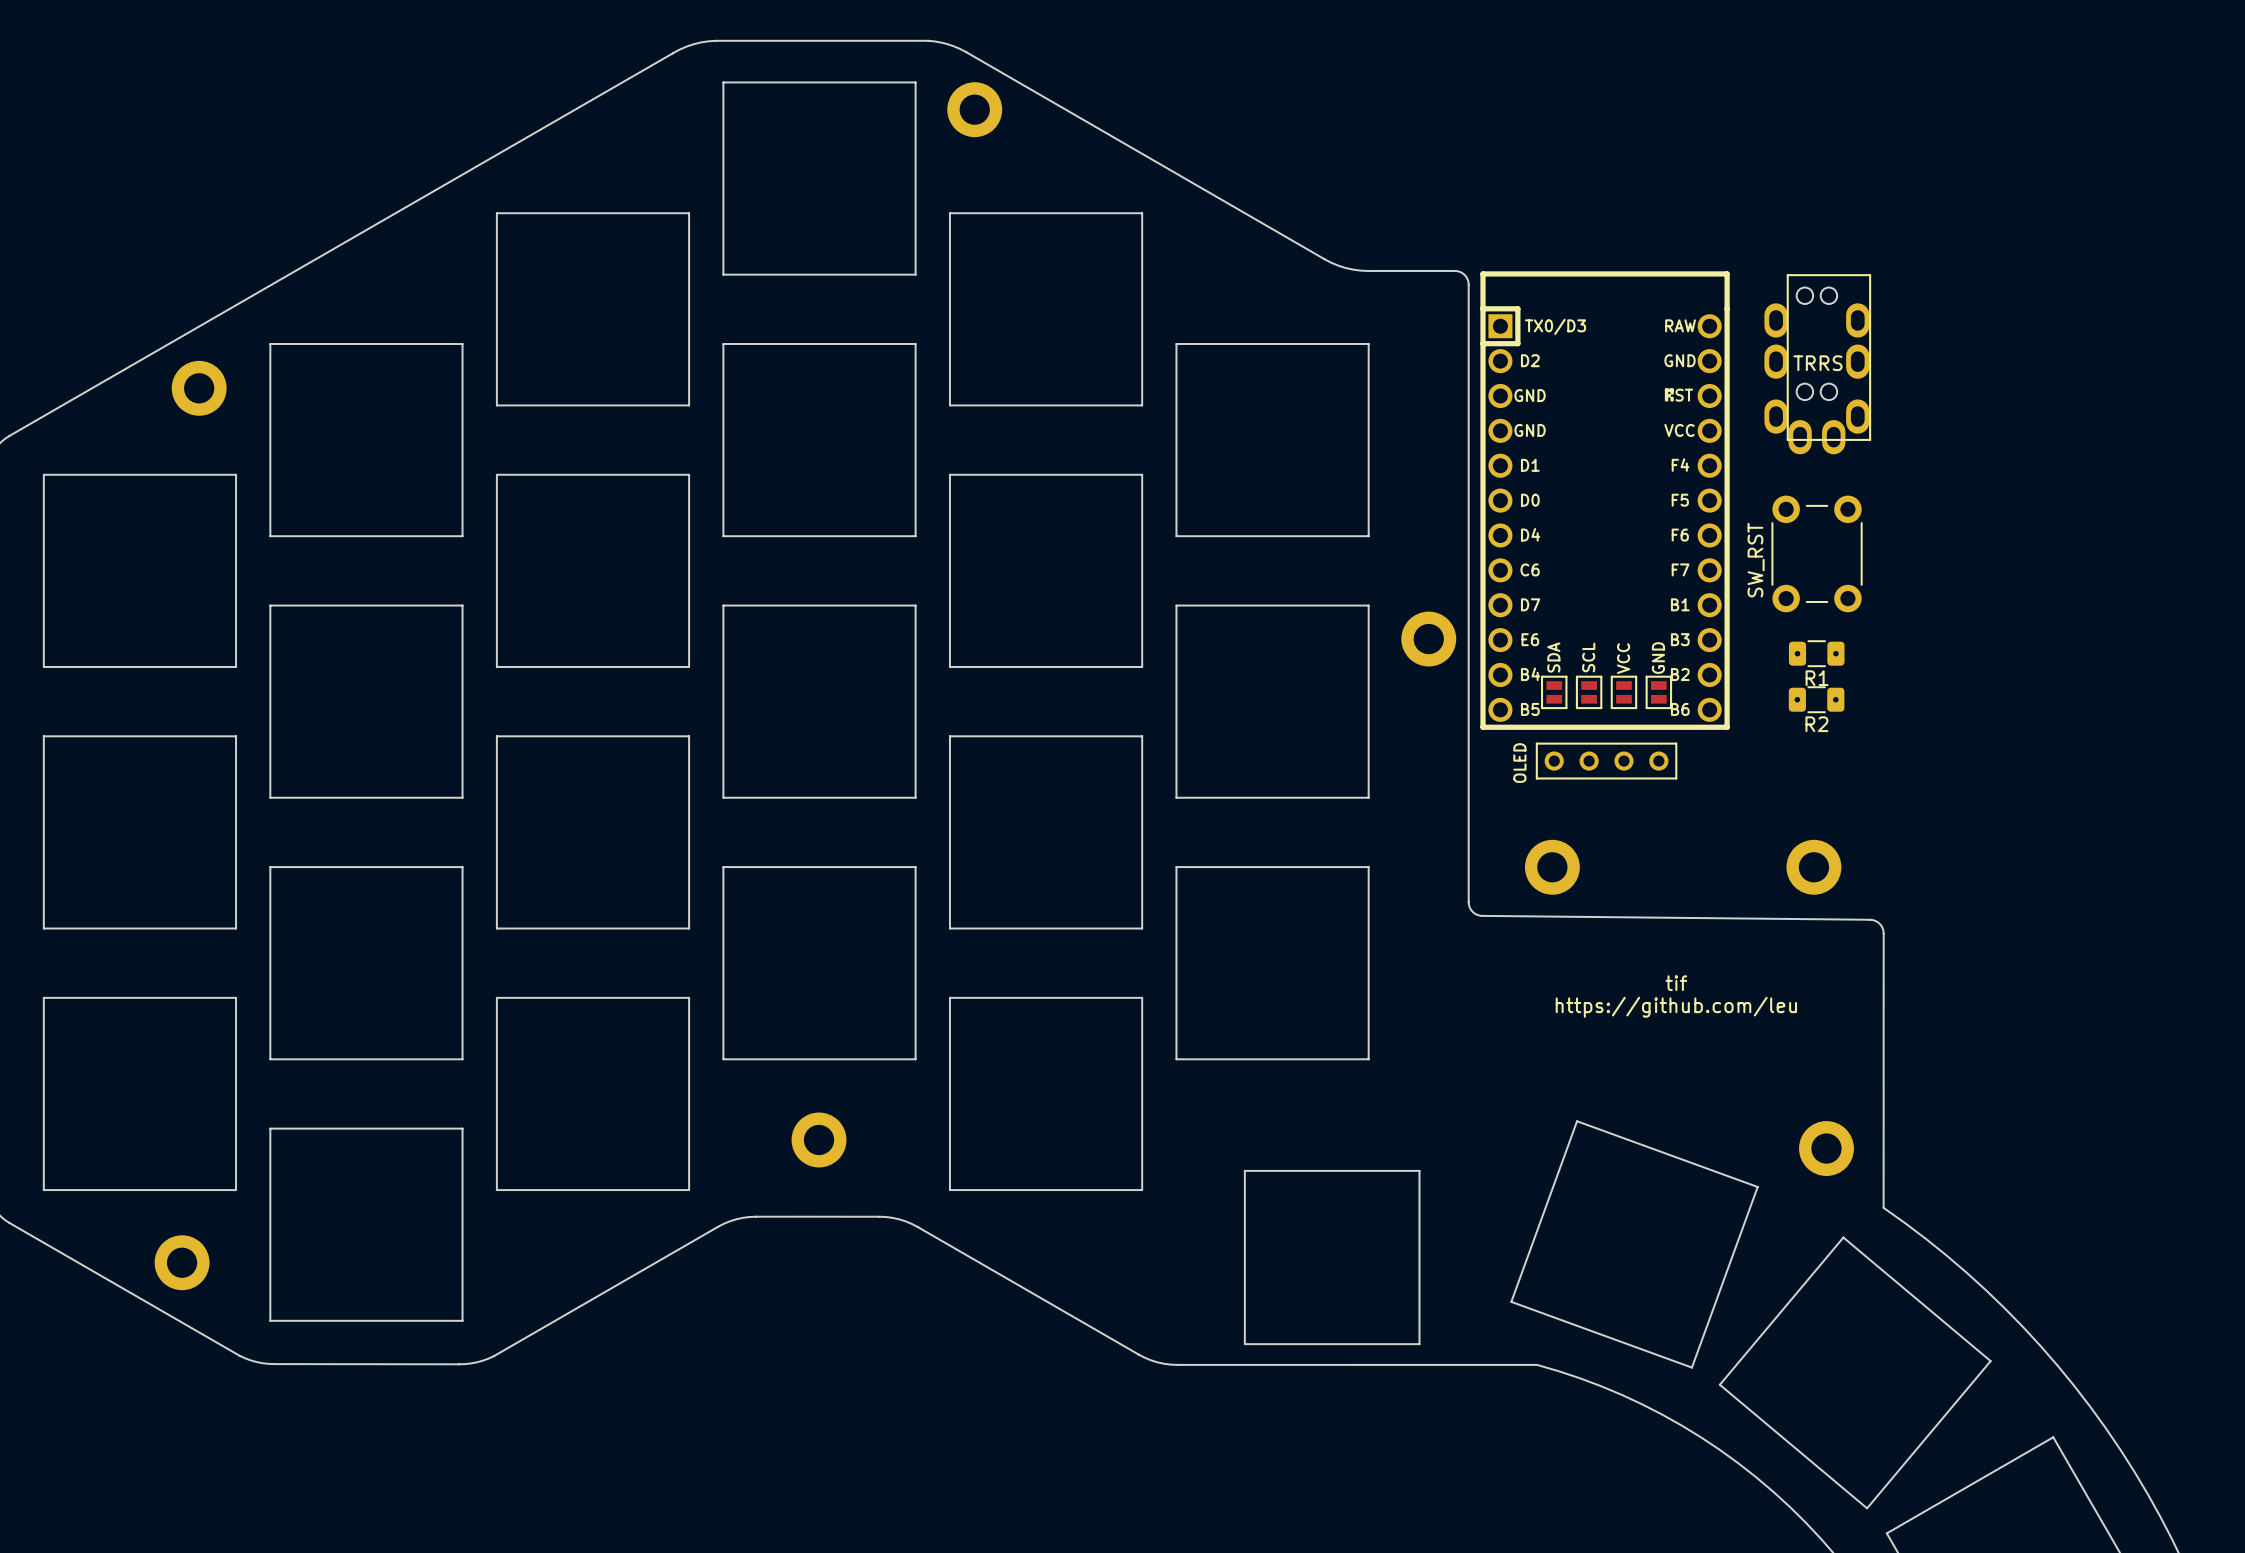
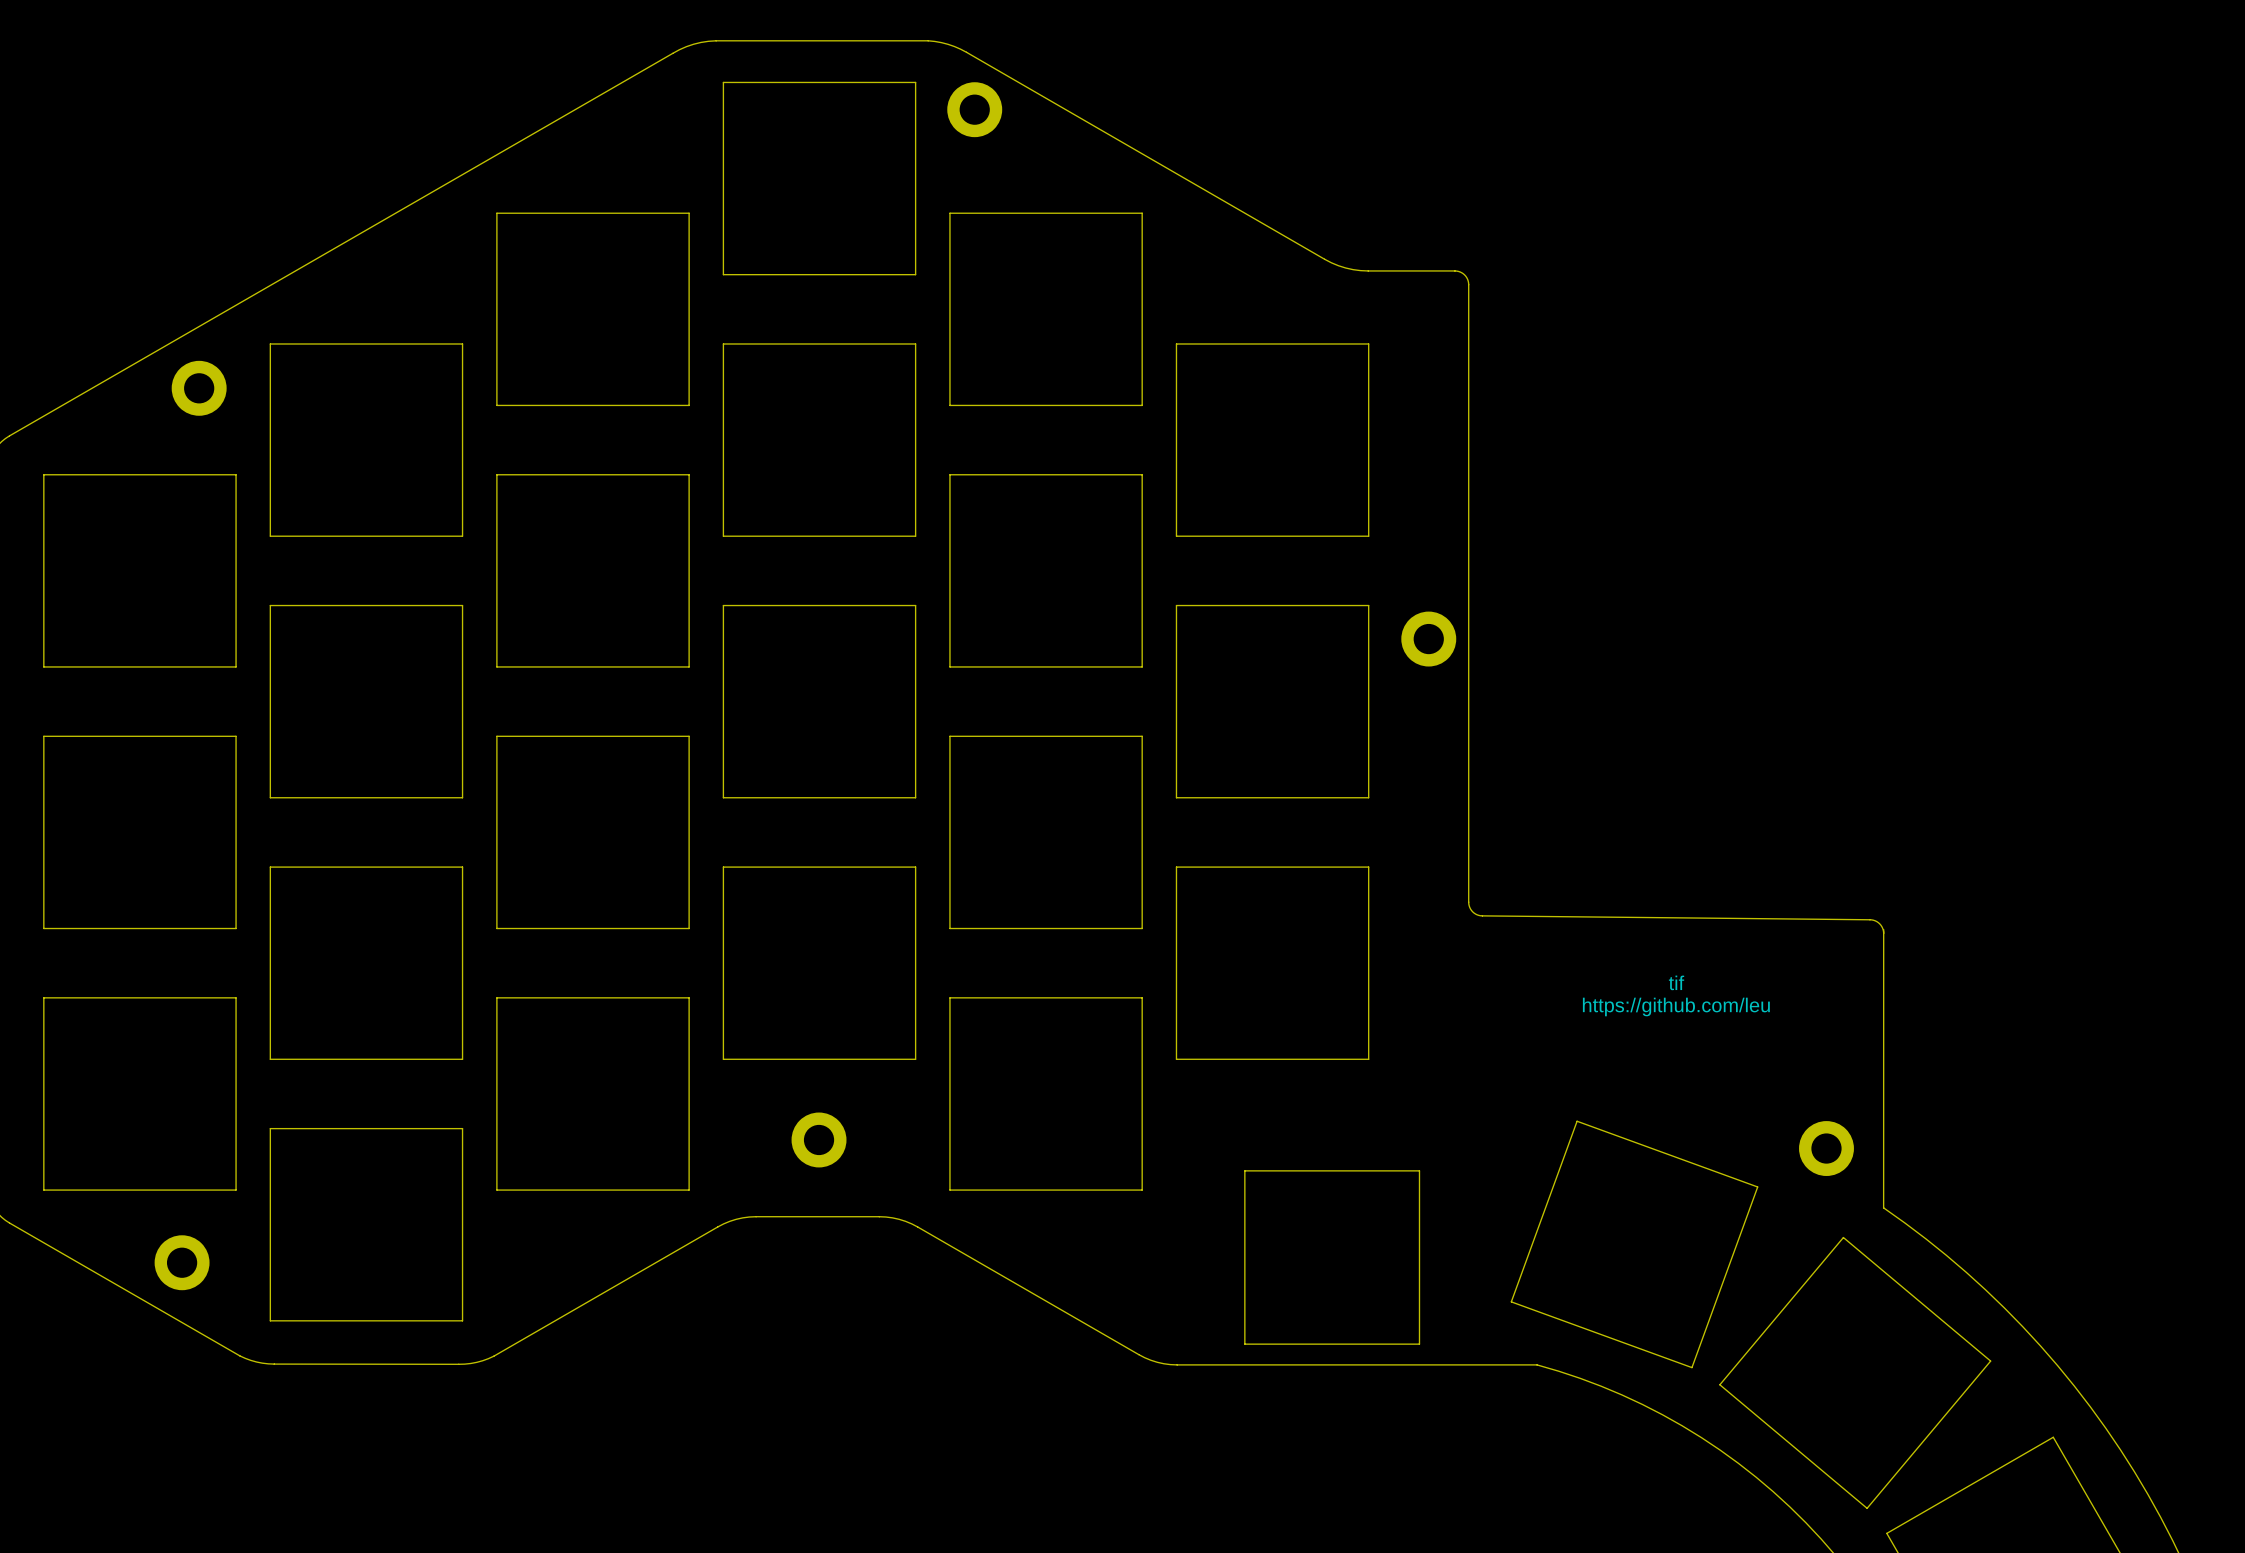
part: (1817, 364) -> none
part: (1605, 500) -> none
part: SW_RST (1817, 553) -> none
R1: (1816, 653) -> none
part: SDA (1554, 692) -> none
part: SCL (1589, 692) -> none
part: VCC (1623, 692) -> none
part: GND (1658, 692) -> none
R2: (1816, 699) -> none
OLED: (1606, 761) -> none
part: (1552, 867) -> none
part: (1813, 867) -> none

